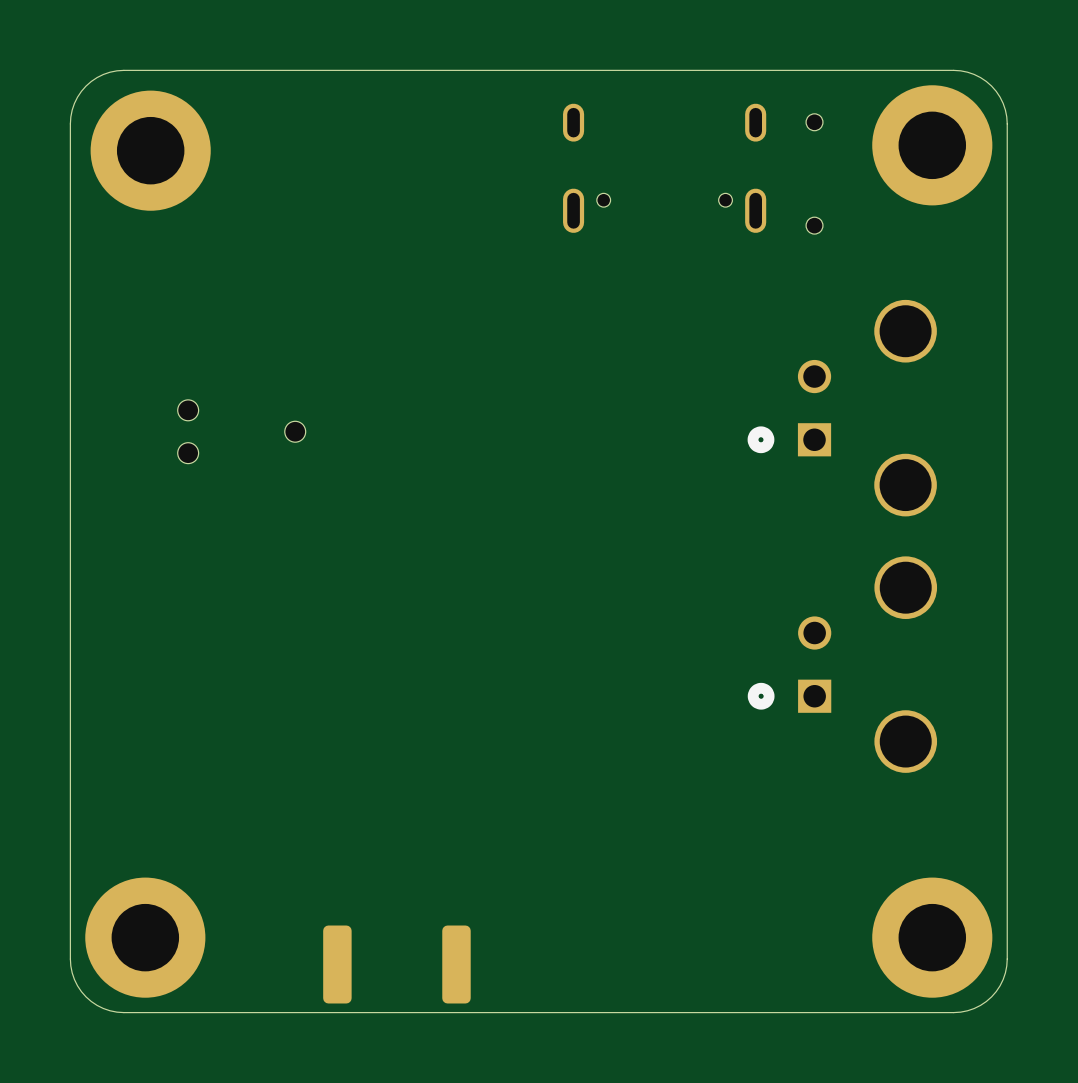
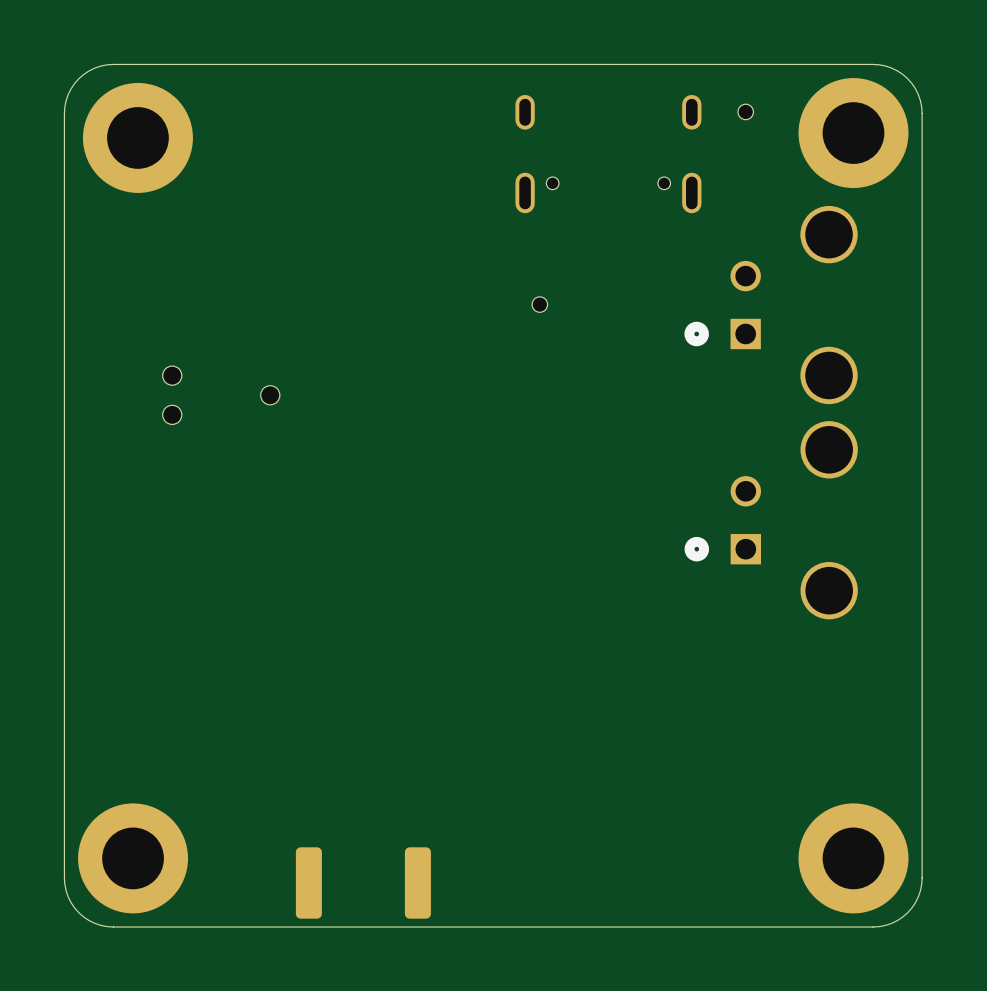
part position: (814, 225) -> (539, 304)
part position: (842, 408) -> (771, 305)
part: none -> (771, 520)
part: (842, 664) -> none

